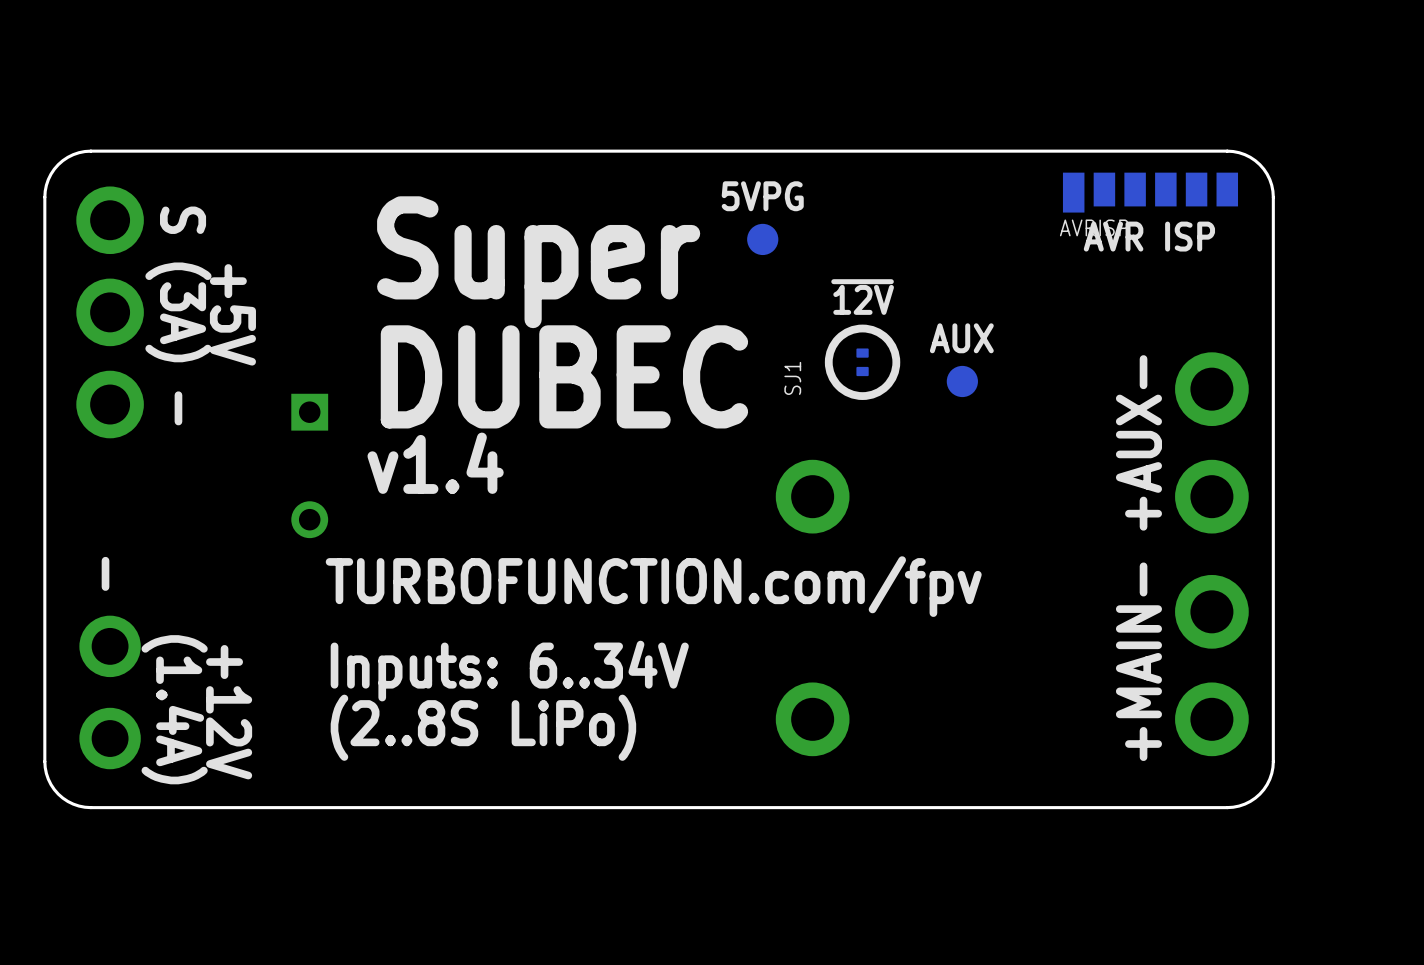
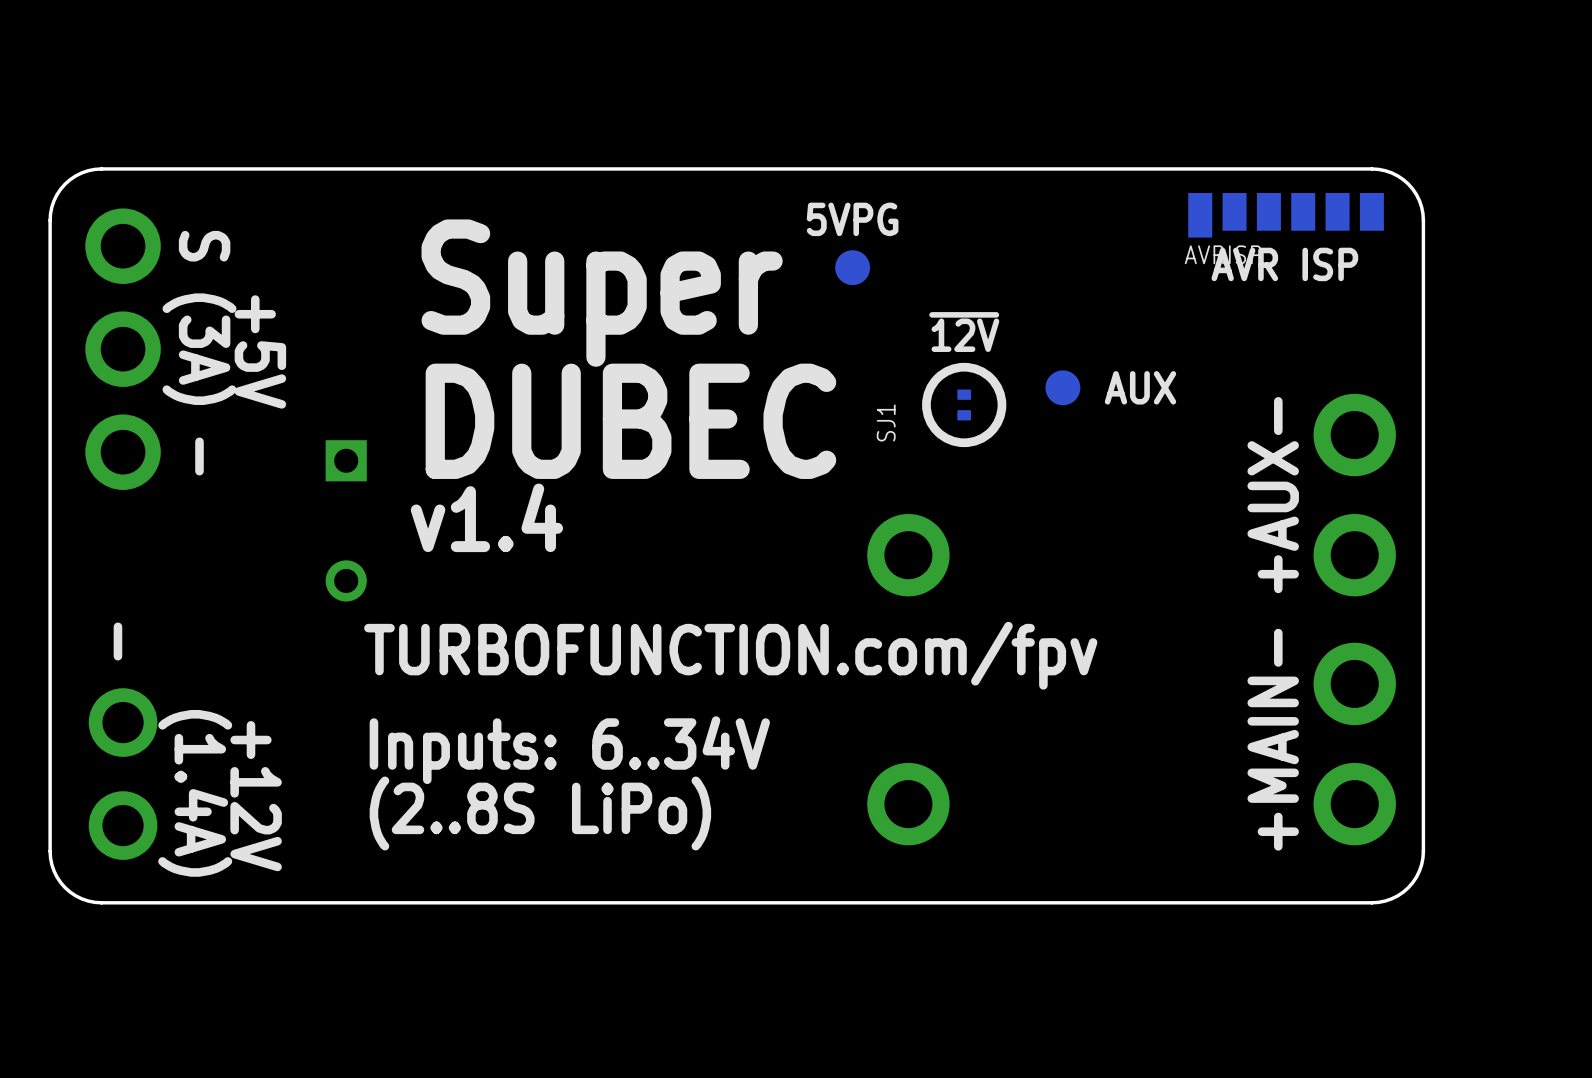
text position: AUX (961, 338) -> AUX (1140, 387)
part position: (962, 381) -> (1062, 387)

